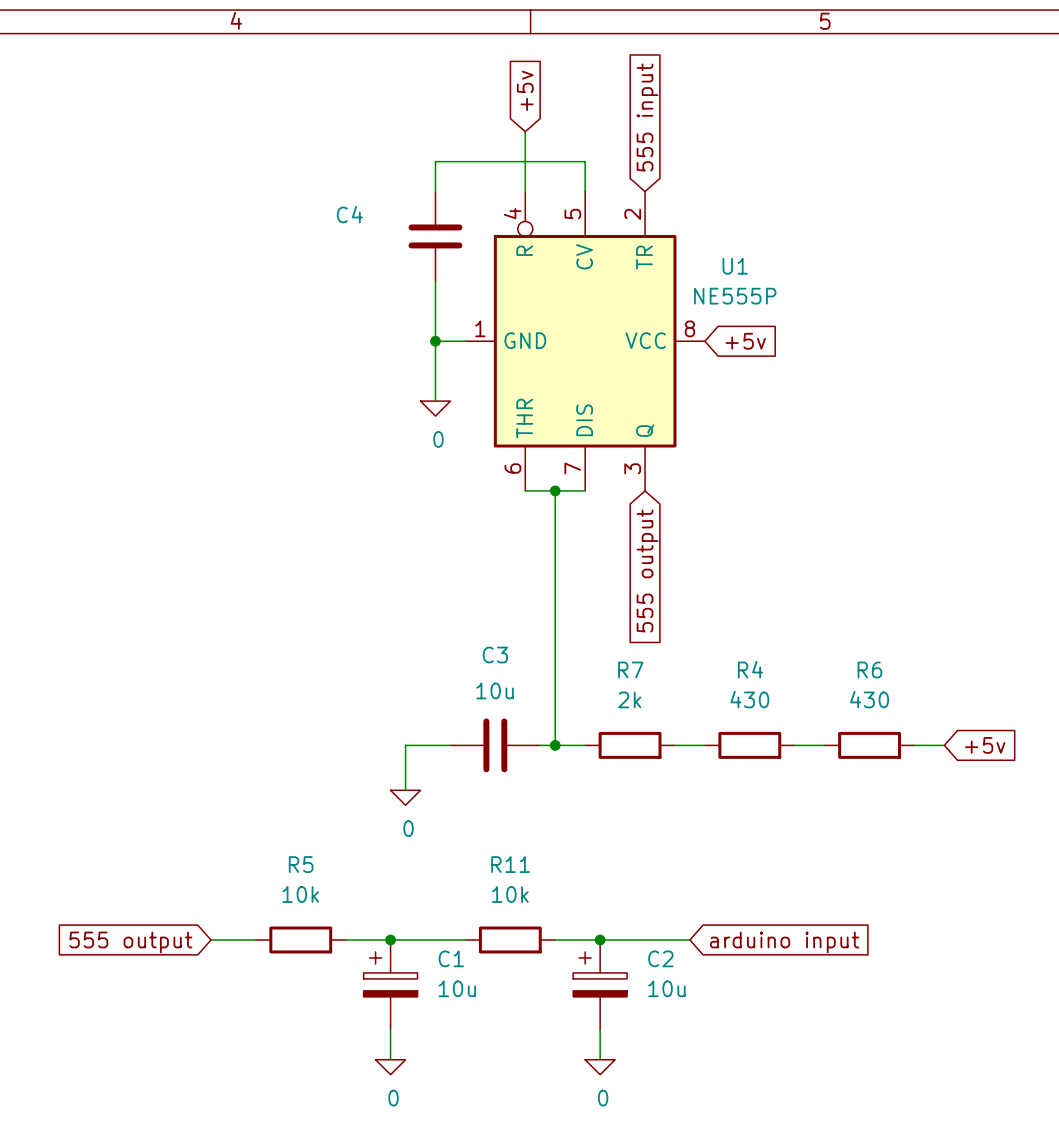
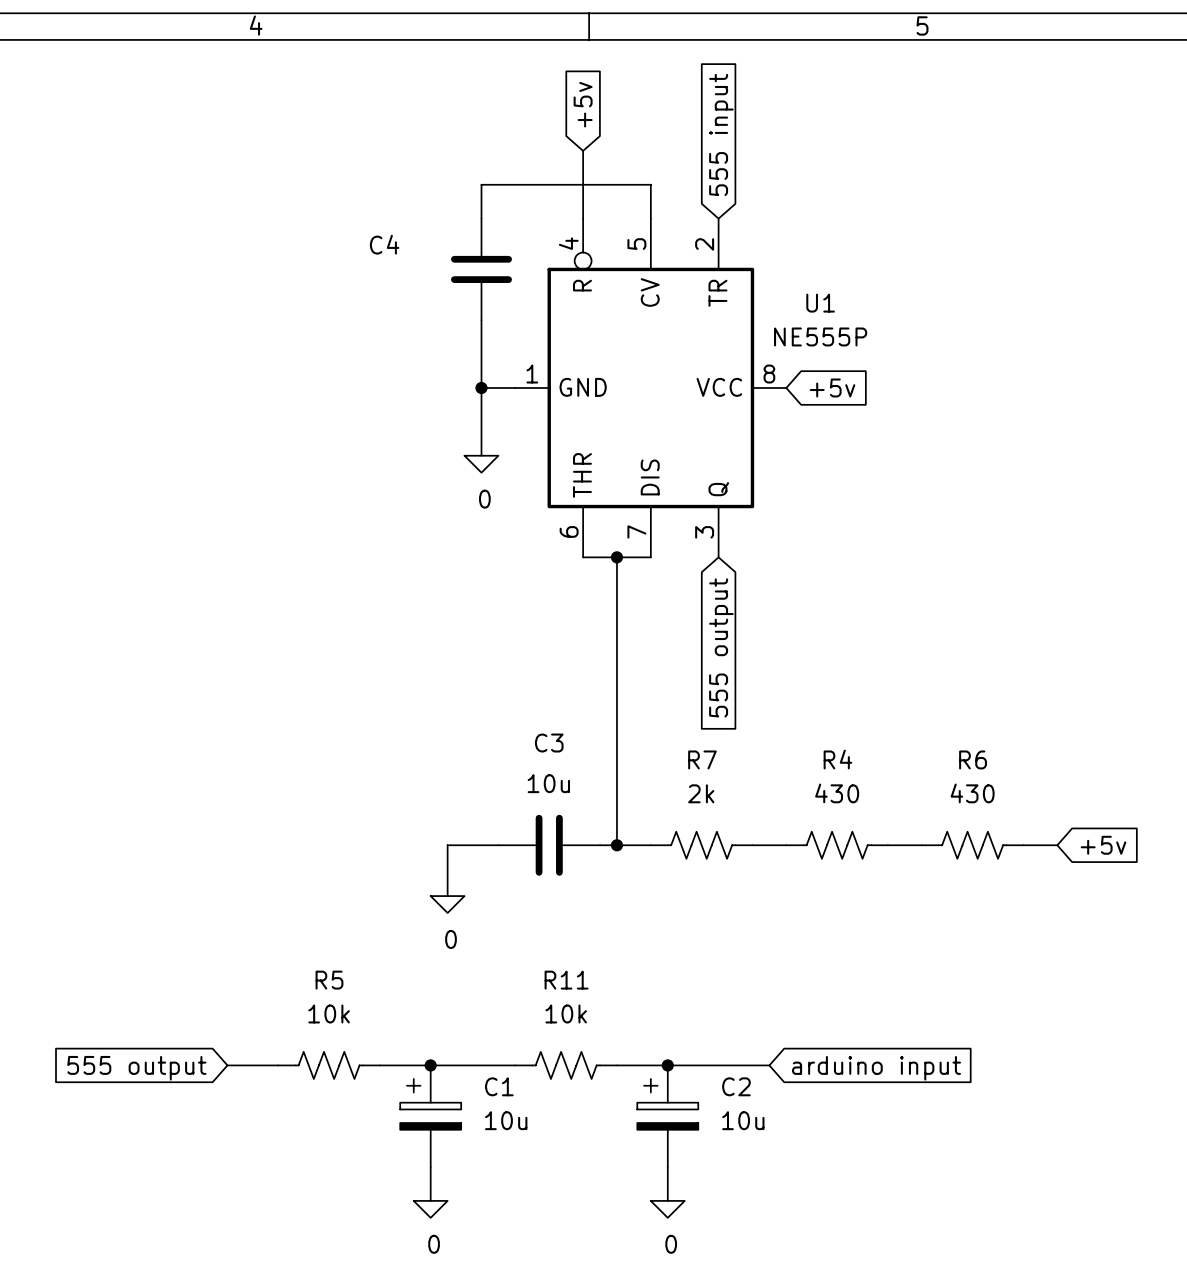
R7 symbol: [585, 731, 675, 759] -> [650, 831, 753, 859]
R4 symbol: [704, 731, 795, 759] -> [786, 831, 888, 859]
R6 symbol: [824, 731, 915, 759] -> [921, 831, 1024, 859]
R5 symbol: [255, 926, 346, 954] -> [278, 1051, 380, 1079]
R11 symbol: [465, 926, 556, 954] -> [515, 1051, 617, 1079]

